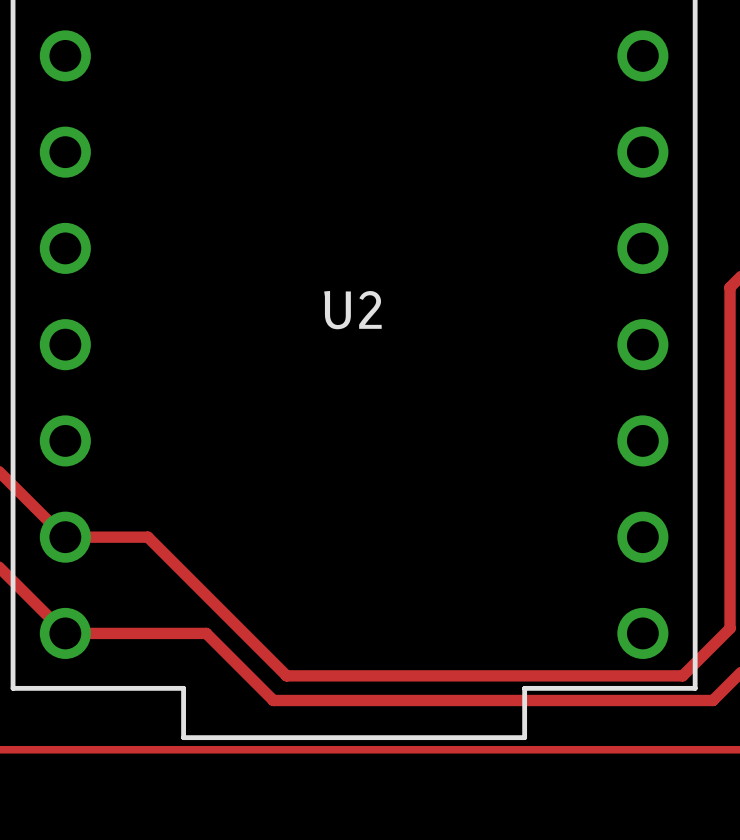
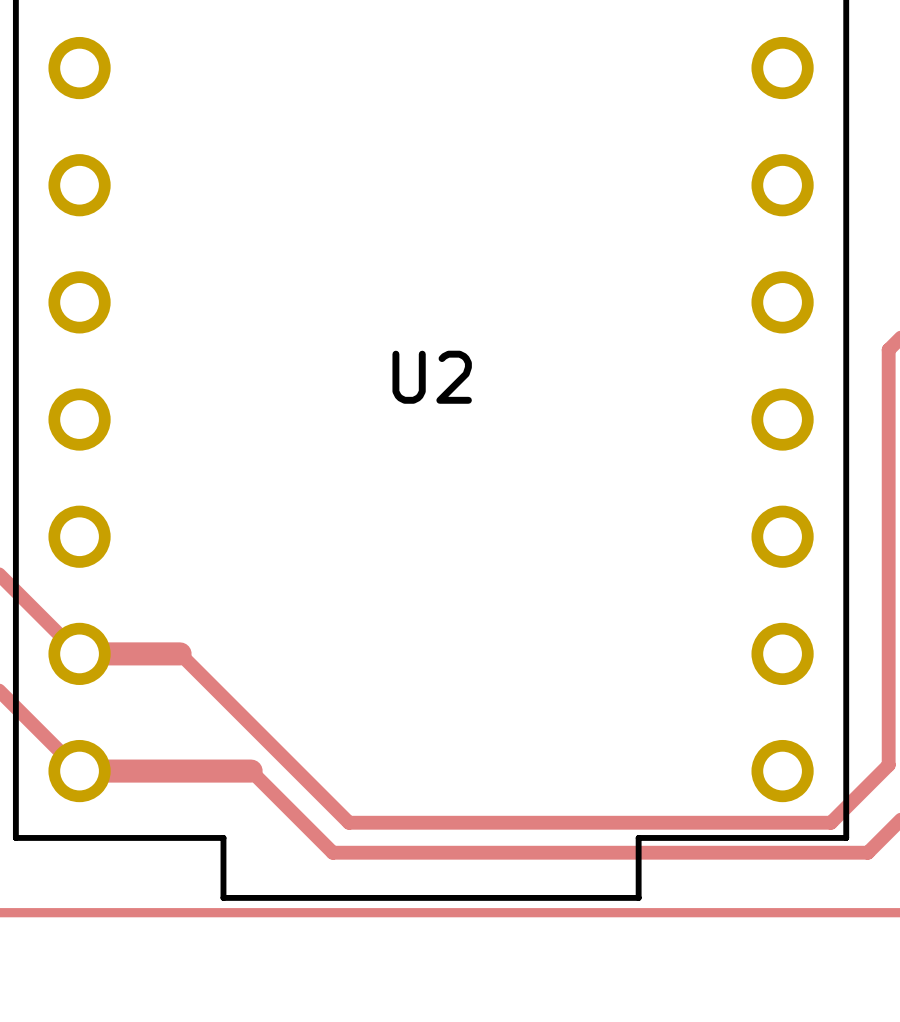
track width: thin (65, 537) (147, 537) -> thick (79, 653) (180, 653)
track width: thin (65, 633) (206, 633) -> thick (79, 771) (251, 771)

